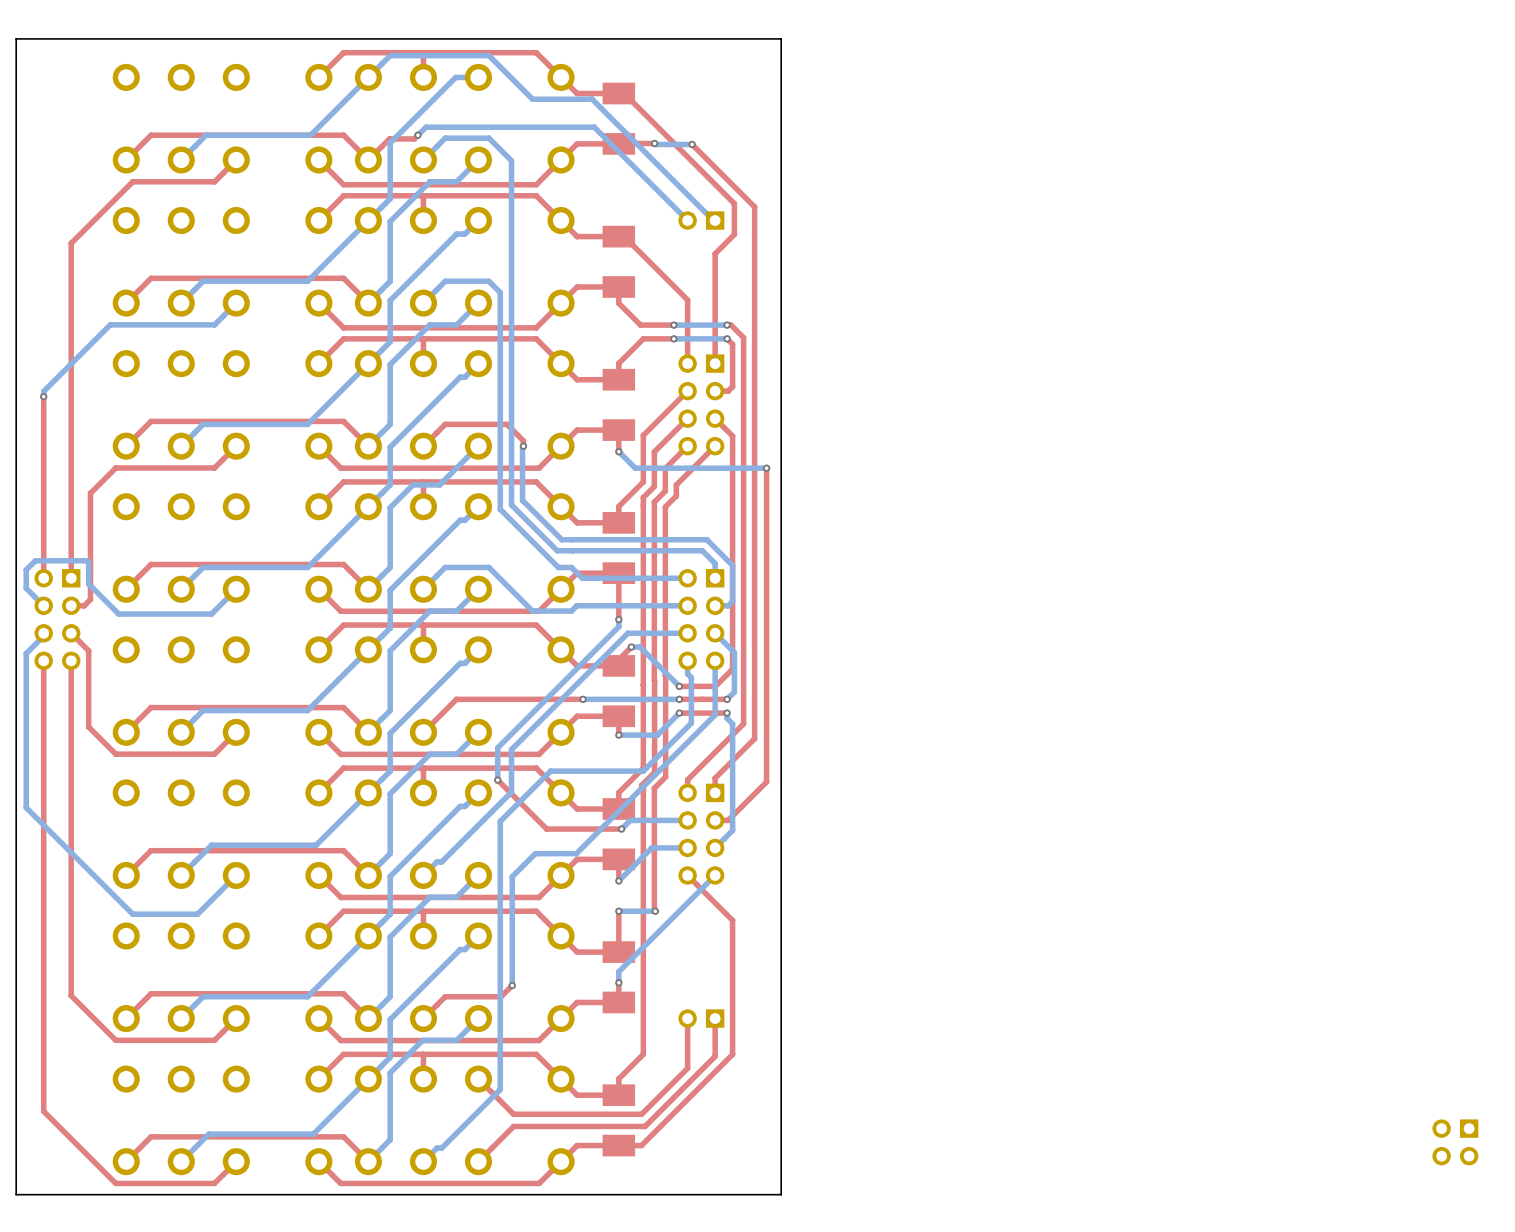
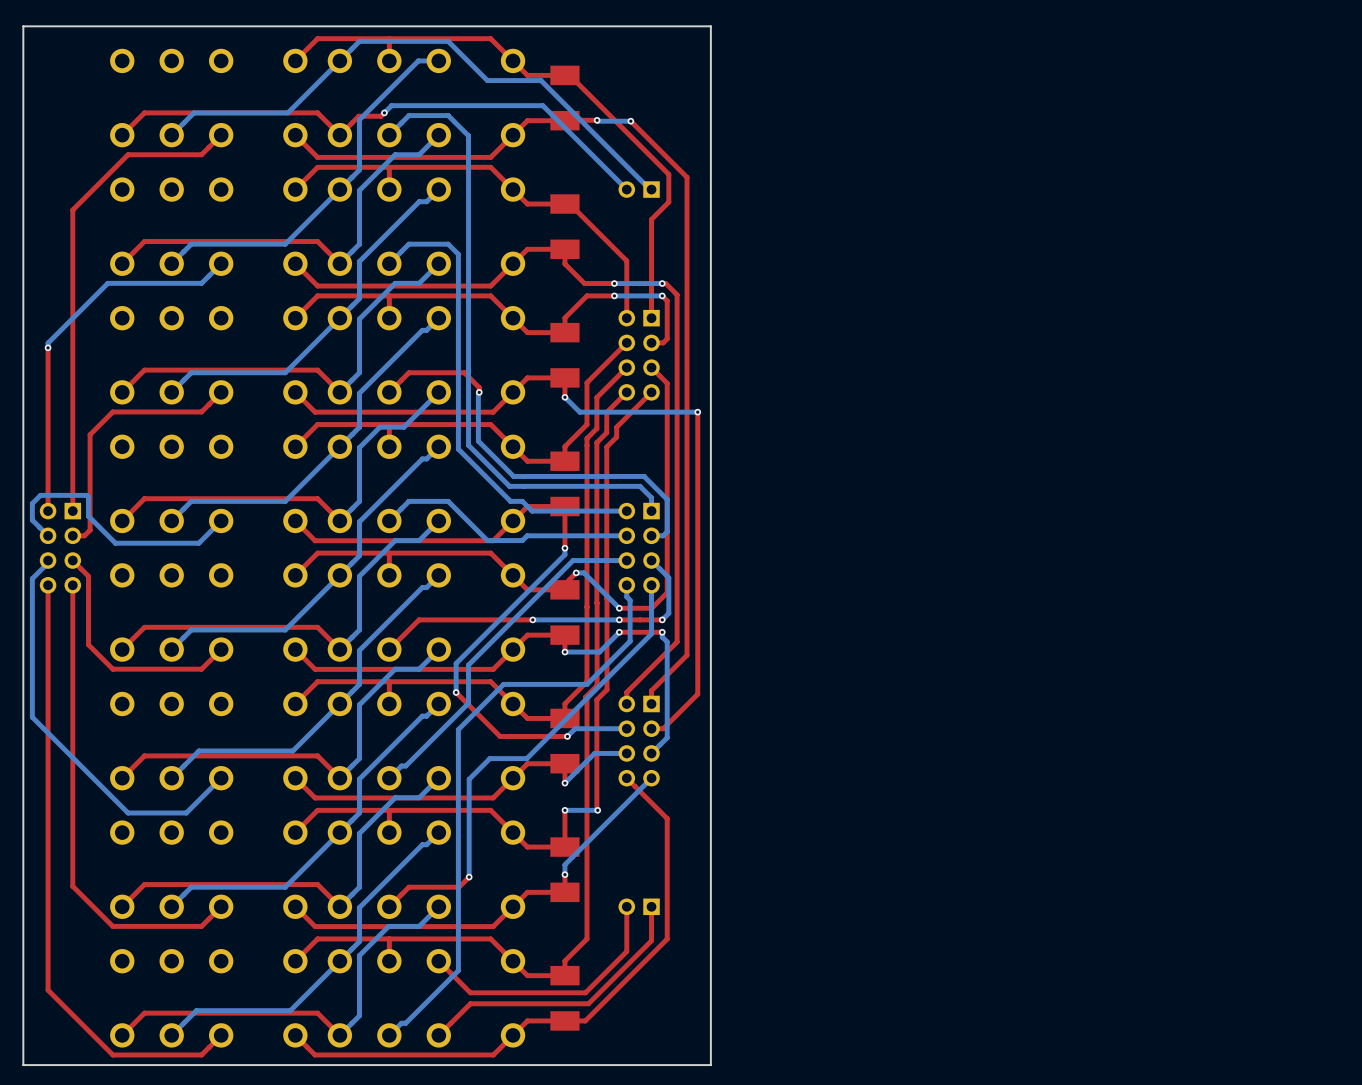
part: (1455, 1142) -> none

